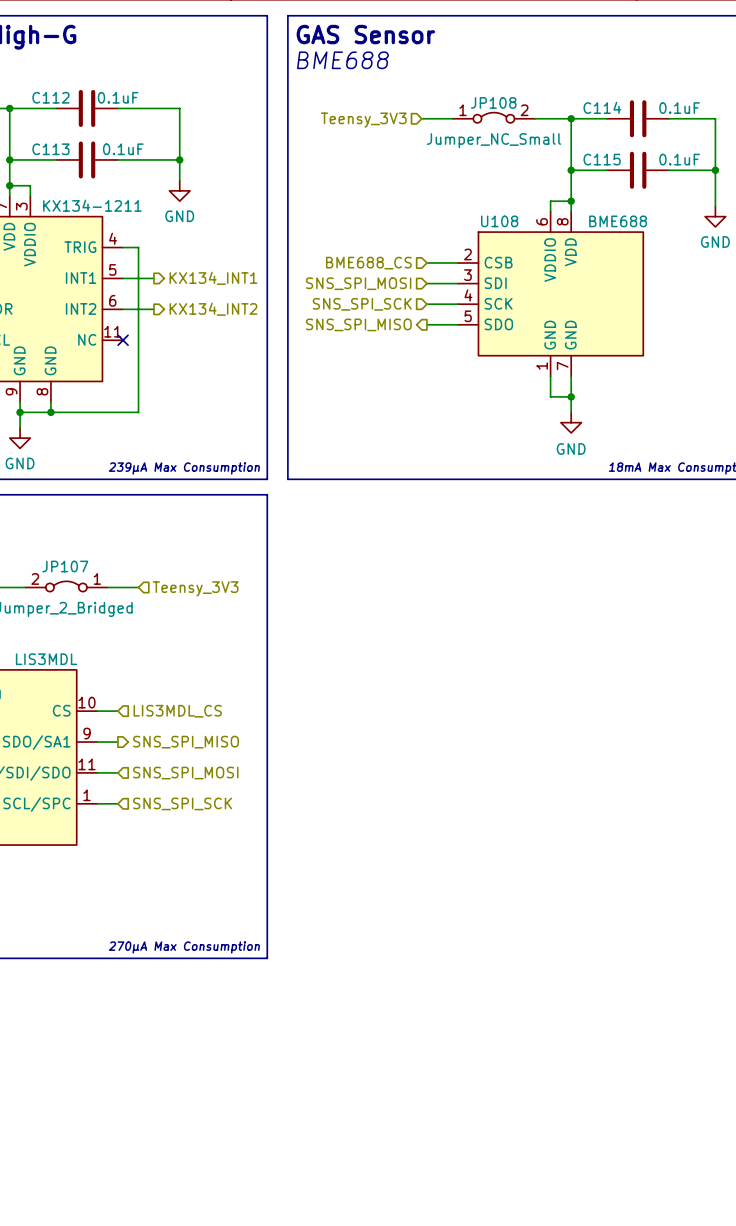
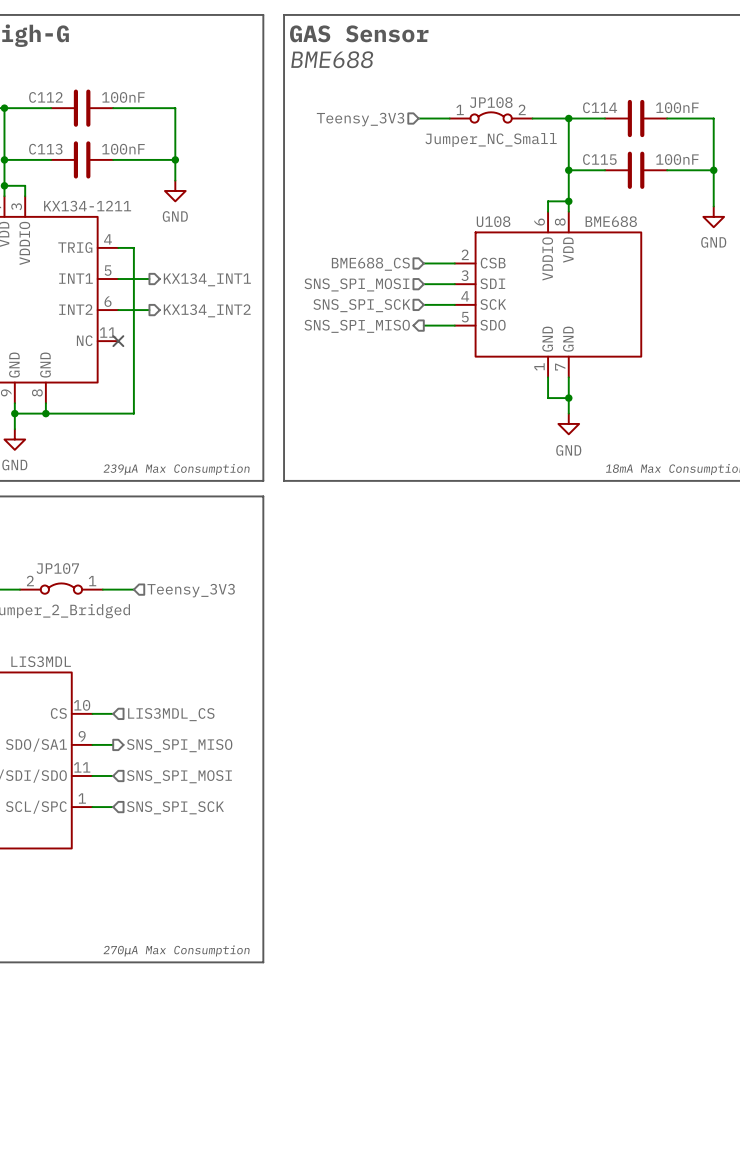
C112 value: 0.1uF (118, 97) -> 100nF (123, 97)
C114 value: 0.1uF (679, 108) -> 100nF (677, 107)
C113 value: 0.1uF (123, 149) -> 100nF (123, 149)
C115 value: 0.1uF (679, 159) -> 100nF (677, 159)

